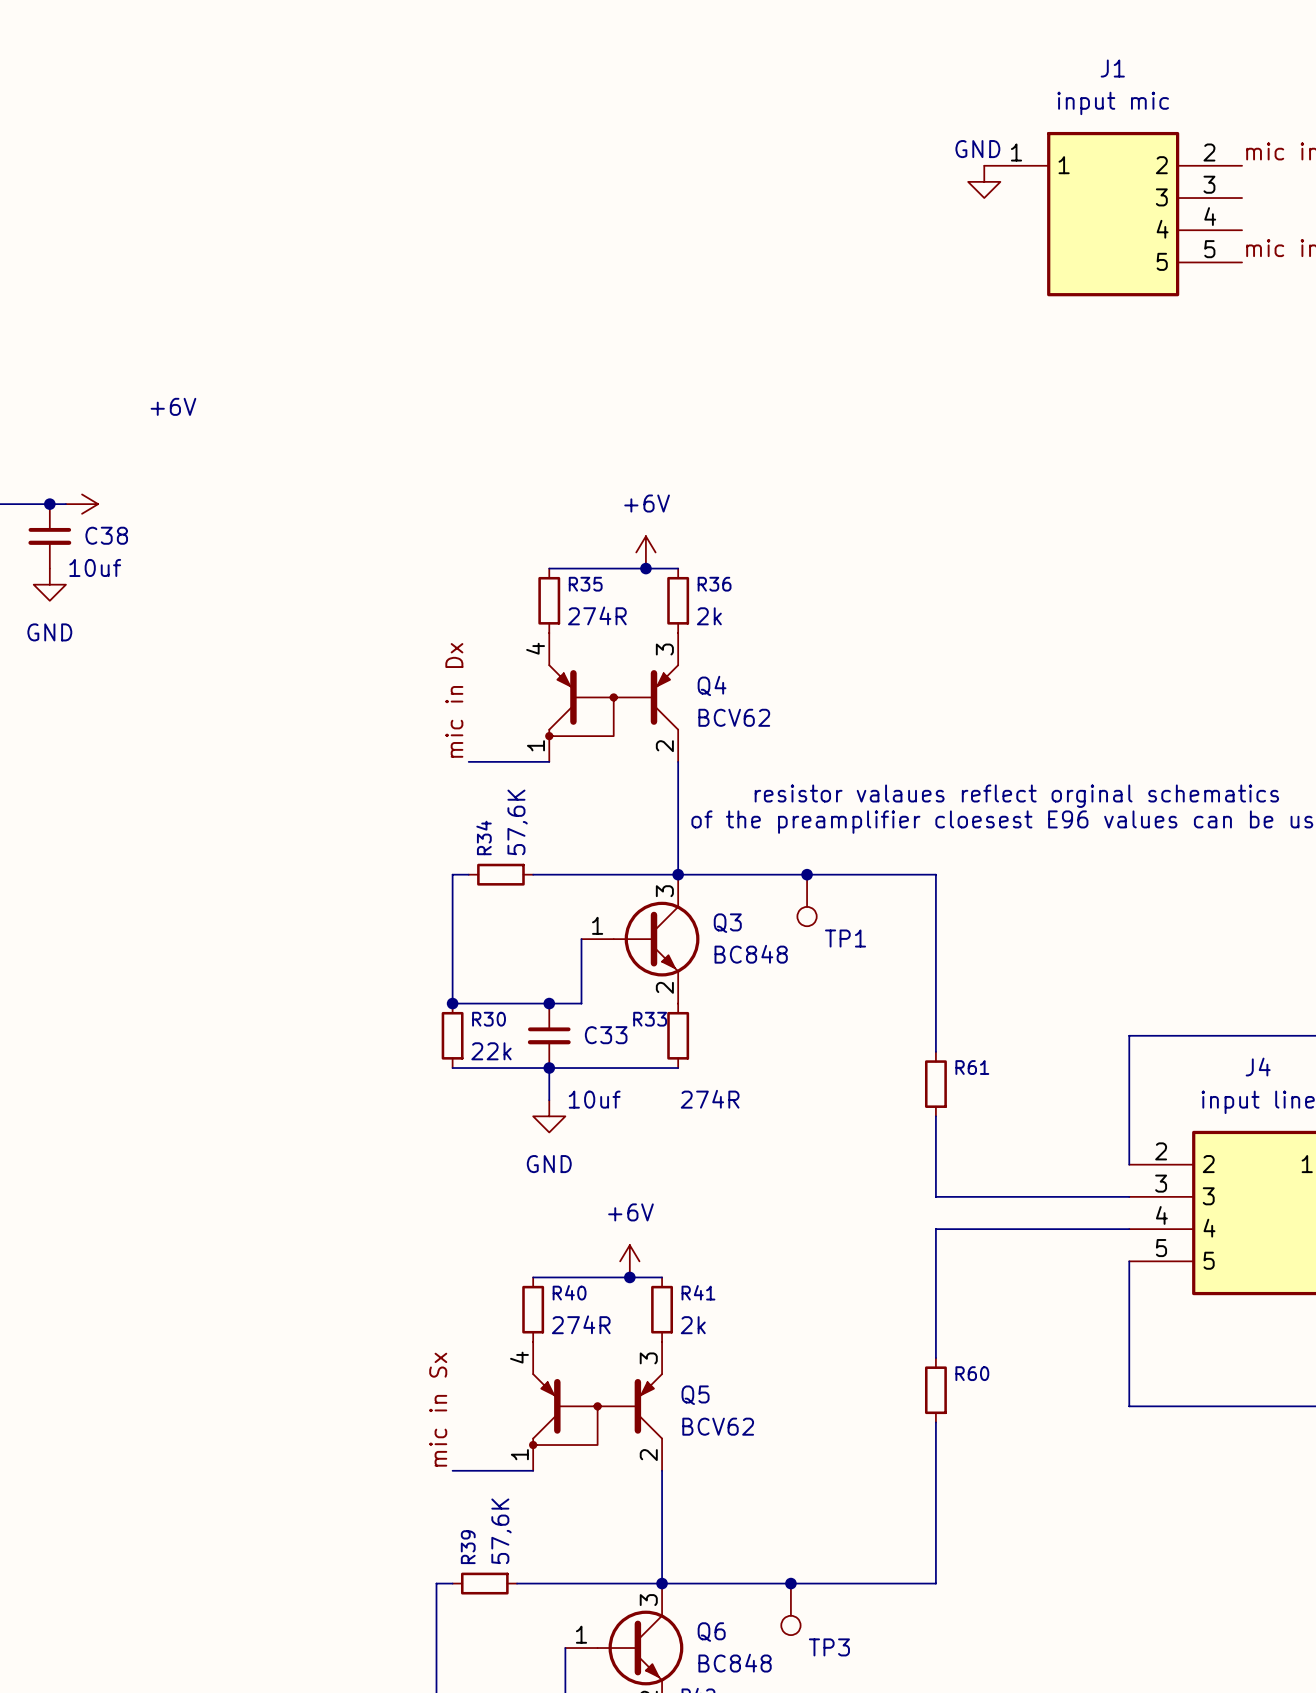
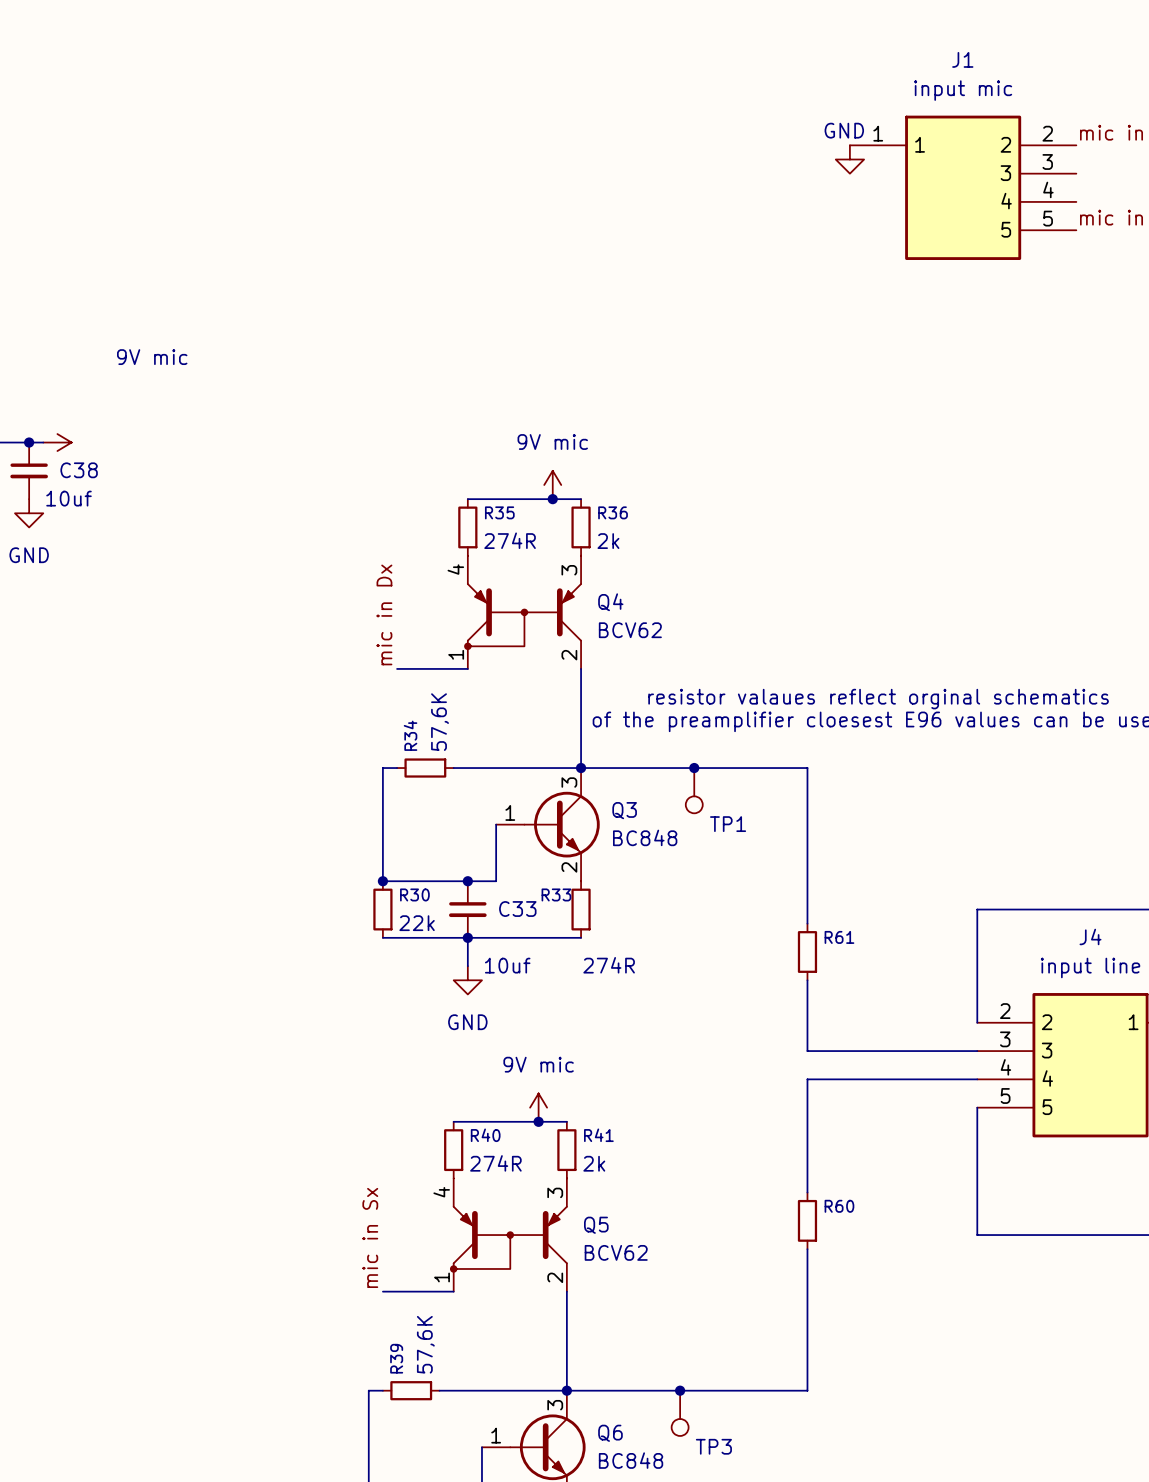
power symbol: +6V (82, 504) -> 9V mic (57, 442)
power symbol: +6V (645, 552) -> 9V mic (552, 484)
power symbol: +6V (629, 1261) -> 9V mic (538, 1107)

